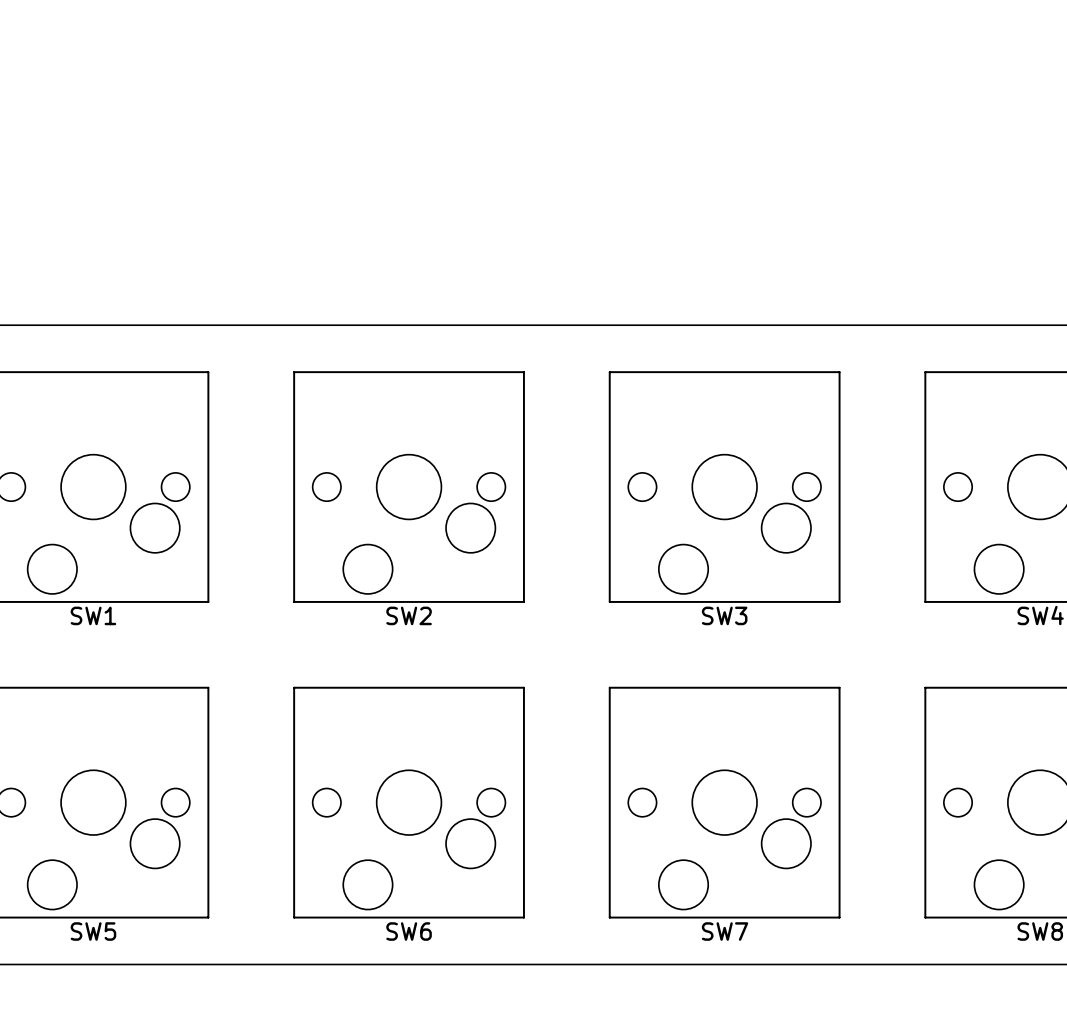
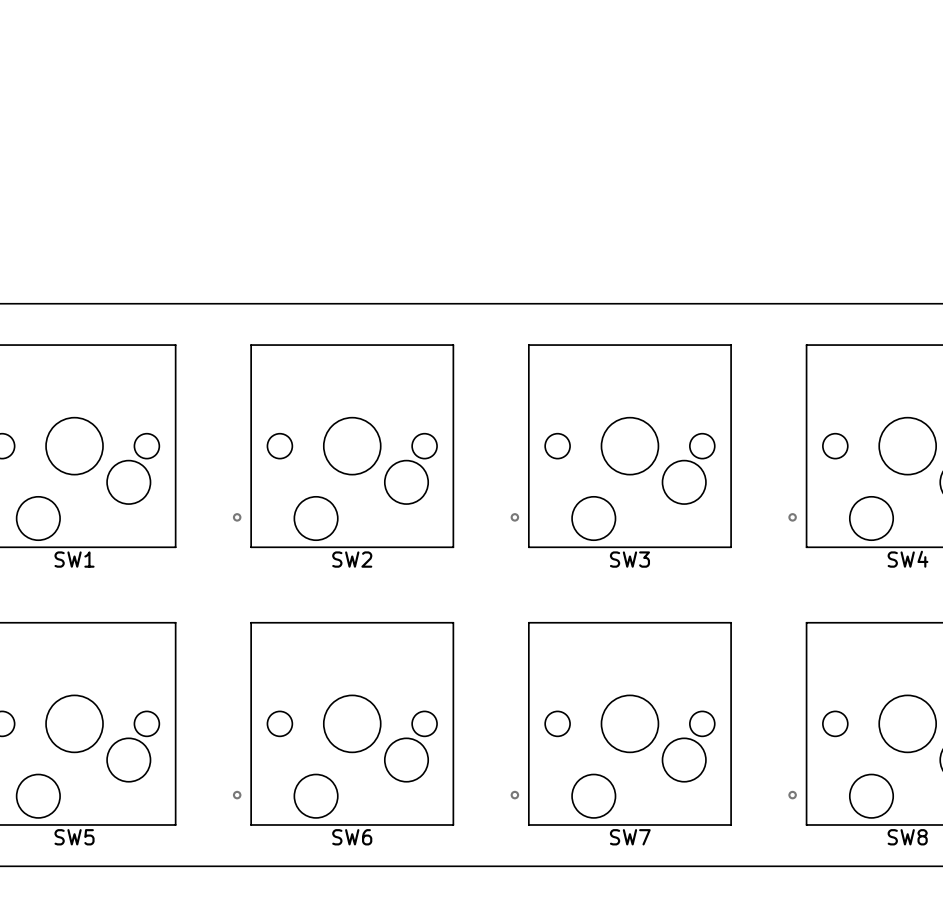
via: none -> (237, 517)
via: none -> (514, 517)
via: none -> (792, 517)
via: none -> (237, 795)
via: none -> (514, 795)
via: none -> (792, 795)

